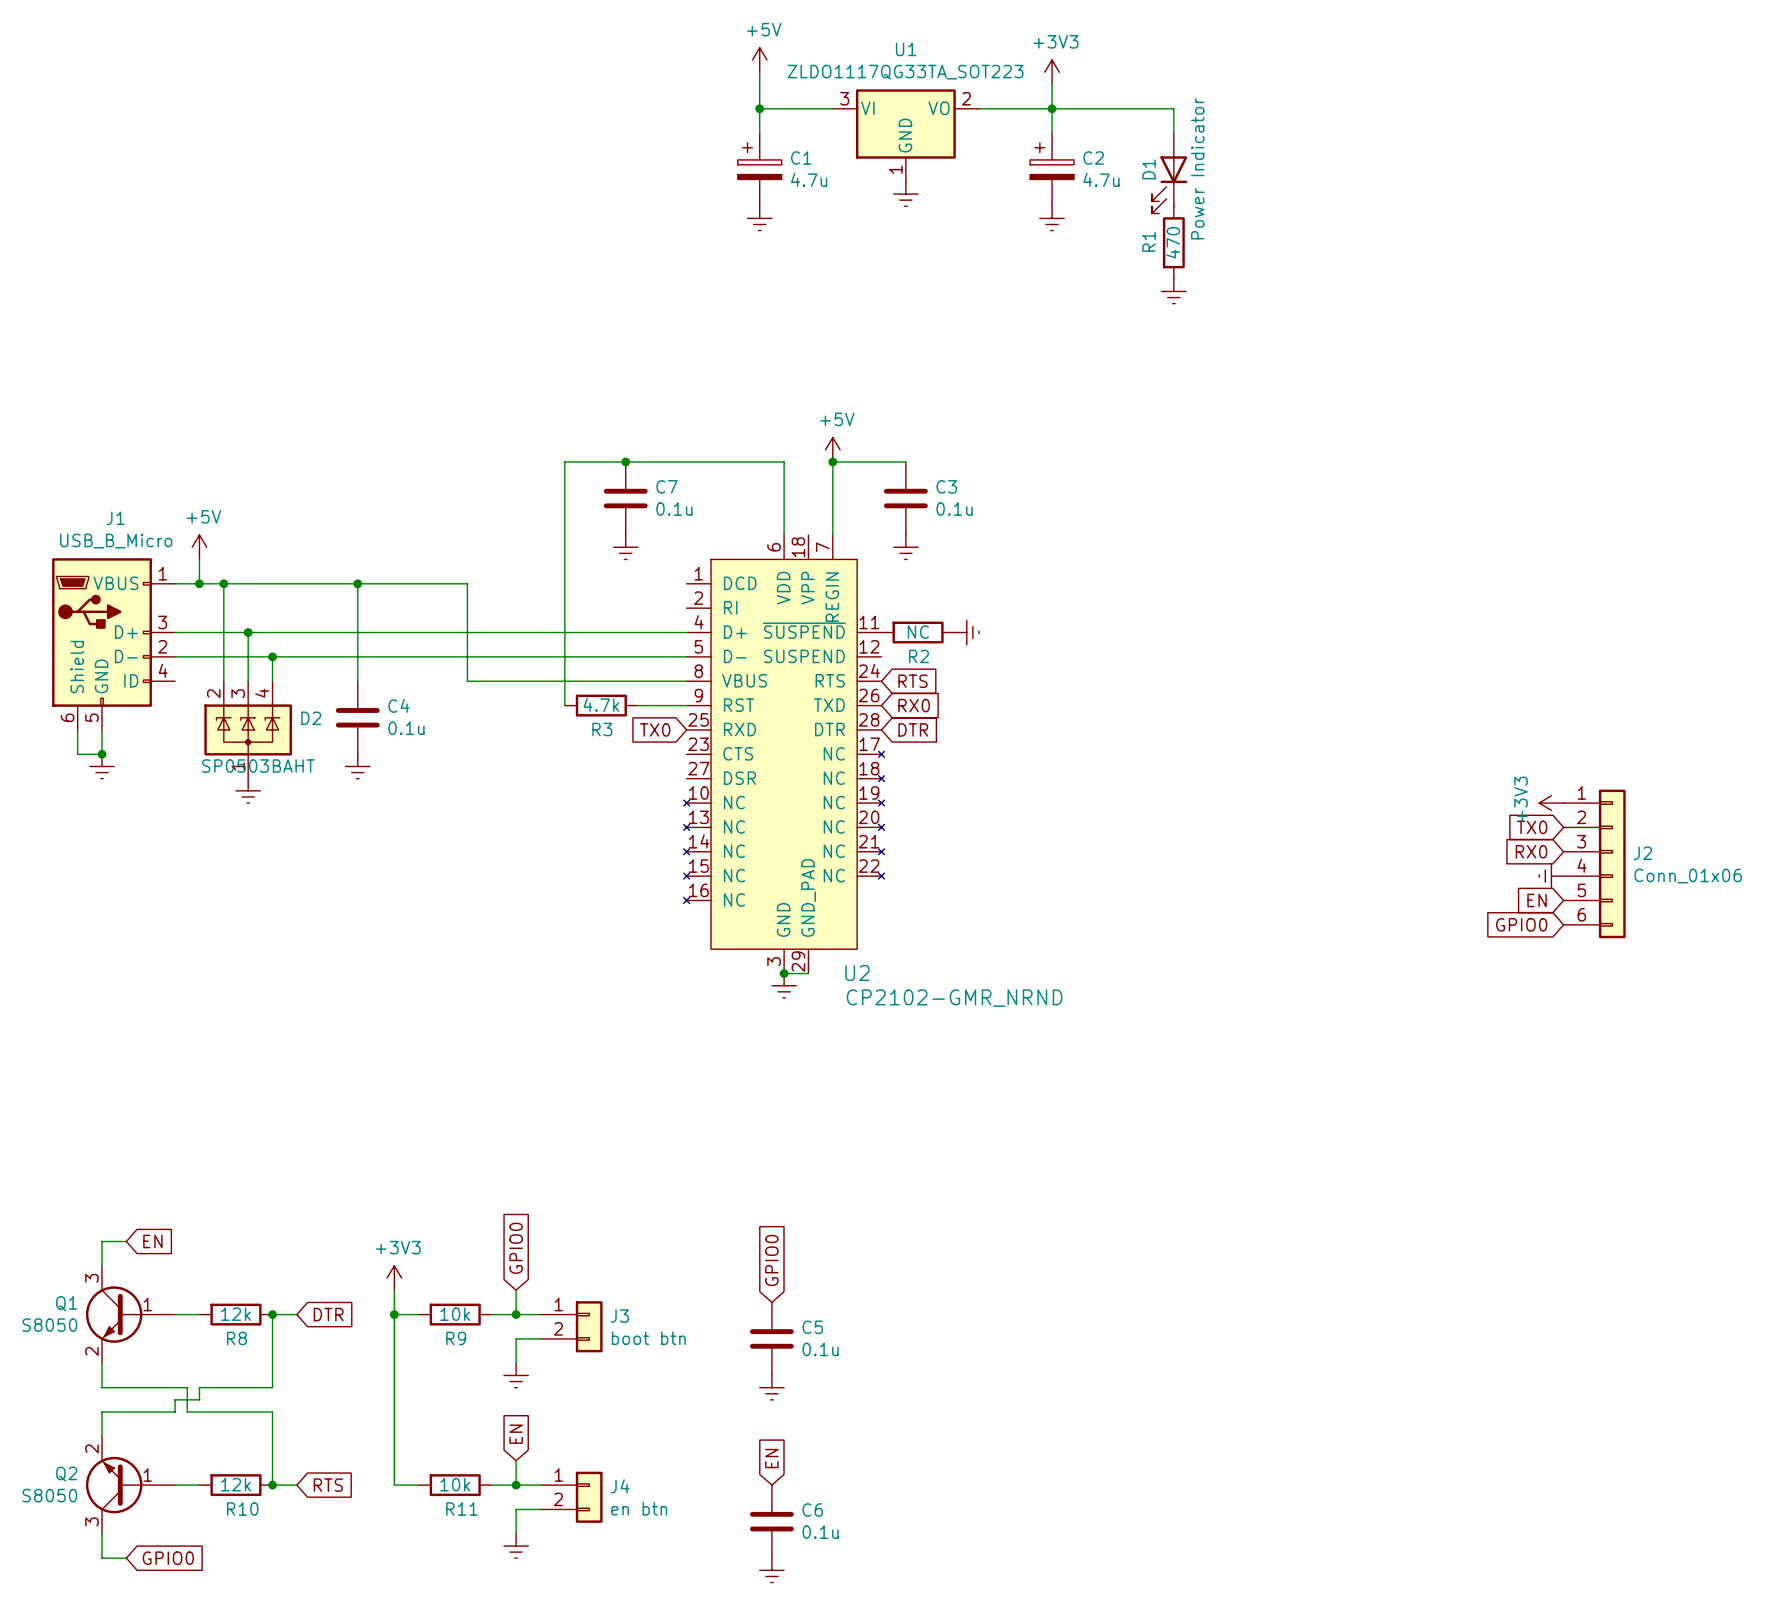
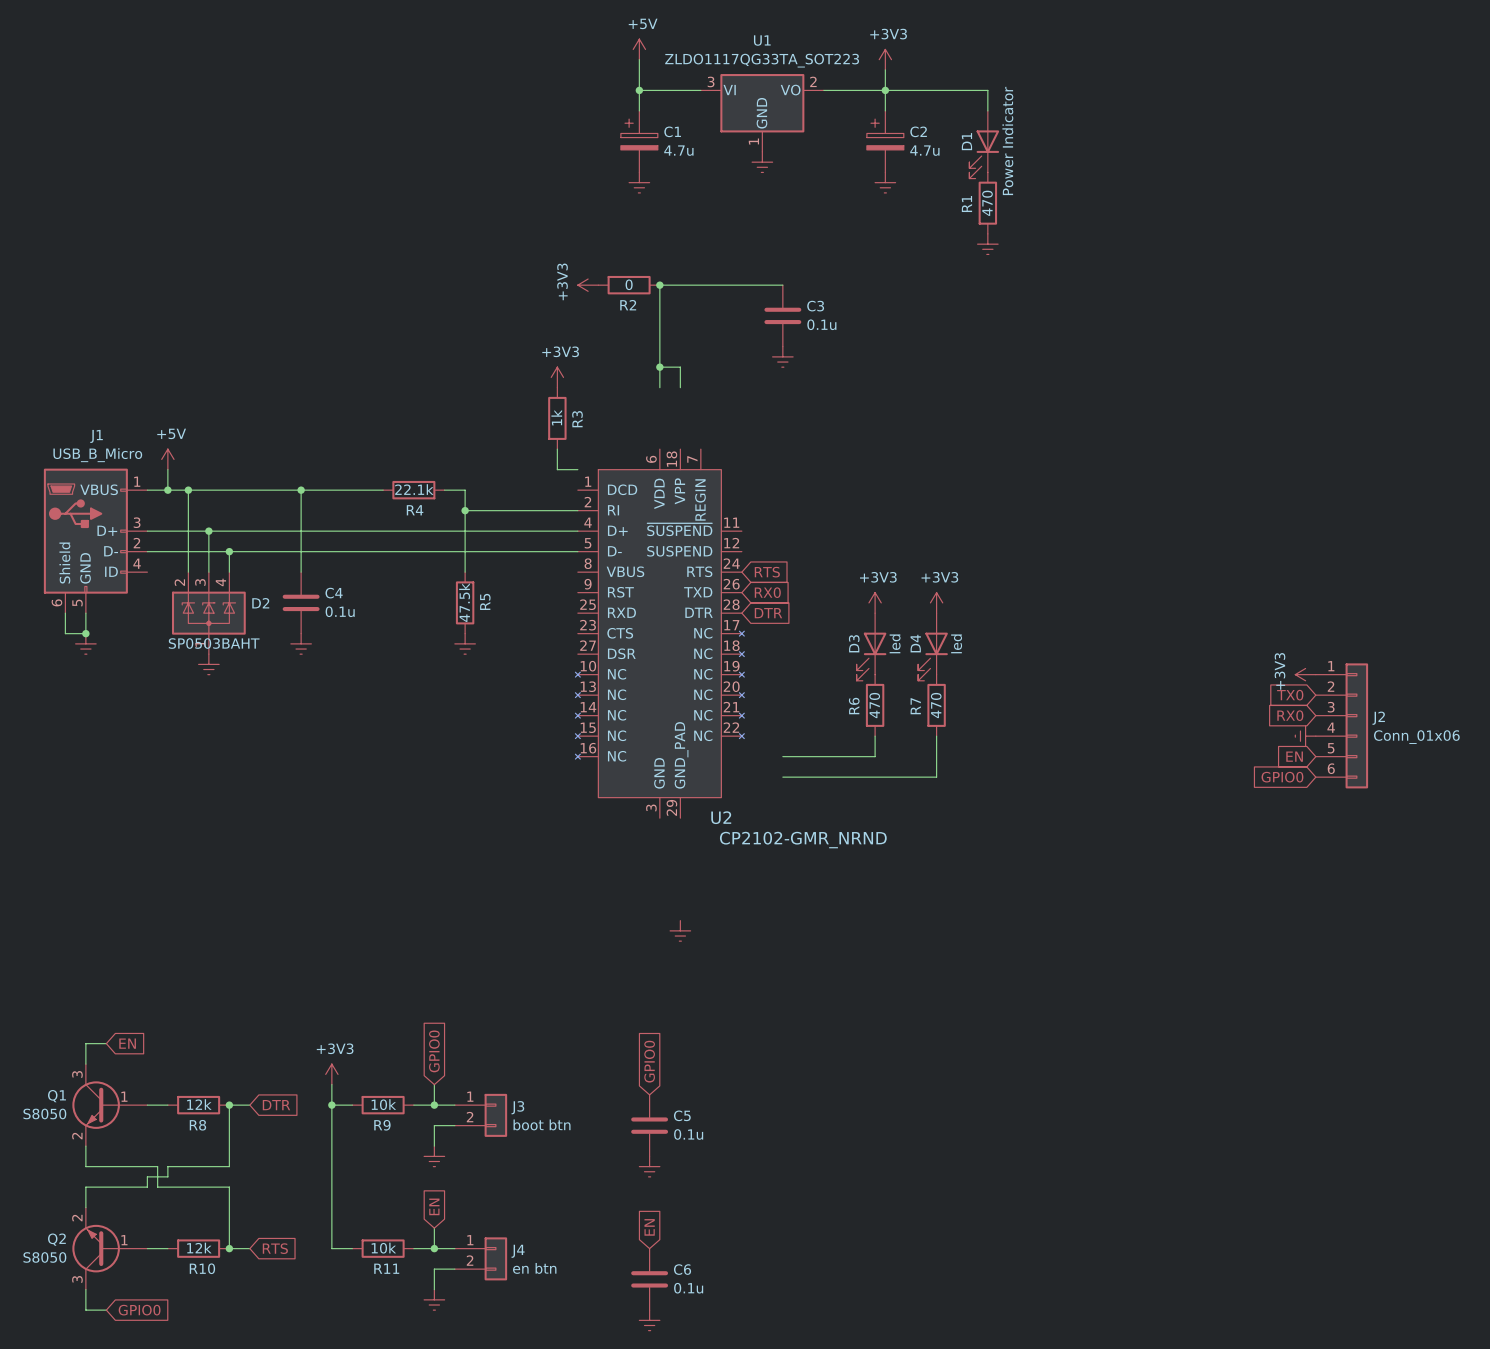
power symbol: none -> +3V3 (588, 285)
junction: none -> (659, 285)
wire: none -> (782, 285) (659, 285) (659, 387)
power symbol: none -> (782, 356)
wire: none -> (659, 367) (680, 367) (680, 387)
power symbol: none -> +3V3 (557, 377)
power symbol: +5V (832, 449) -> none
junction: (625, 462) -> none
junction position: (832, 462) -> (659, 367)
wire: (905, 462) (832, 462) (832, 535) -> none
C7: 0.1u (625, 498) -> none
C3 position: (905, 498) -> (782, 315)
wire: none -> (557, 449) (557, 469) (577, 469)
wire: (784, 535) (784, 462) (564, 462) (564, 705) -> none
power symbol: (625, 547) -> none
power symbol: (905, 547) -> none
wire: (455, 583) (467, 583) (467, 681) (686, 681) -> none
R4: none -> 22.1k (413, 490)
wire: none -> (444, 490) (465, 490) (465, 572)
wire: none -> (465, 510) (577, 510)
junction: none -> (465, 510)
R2 position: (918, 632) -> (629, 285)
R2 value: NC (918, 632) -> 0 (629, 284)
power symbol: (966, 632) -> none
R3 value: 4.7k (601, 704) -> 1k (556, 417)
R3 rotation: 0° (601, 705) -> 90° clockwise (557, 418)
R3 position: (601, 705) -> (557, 418)
wire: (637, 705) (686, 705) -> none
R5: none -> 47.5k (465, 602)
power symbol: none -> +3V3 (875, 602)
power symbol: none -> +3V3 (936, 602)
R3 name position: R3 (602, 729) -> R3 (577, 419)
global label: TX0 (655, 729) -> none
power symbol: none -> (465, 643)
D3: none -> led (871, 646)
D4: none -> led (933, 646)
R6: none -> 470 (875, 705)
R7: none -> 470 (936, 705)
wire: none -> (875, 736) (875, 756) (782, 756)
wire: none -> (936, 736) (936, 777) (782, 777)
wire: (784, 973) (808, 973) -> none
junction: (784, 973) -> none
power symbol position: (784, 985) -> (680, 930)

